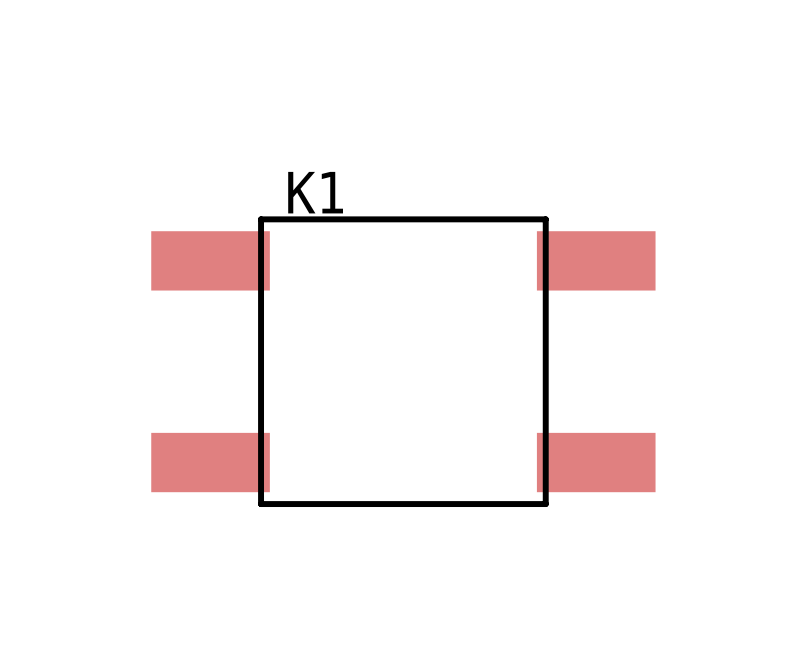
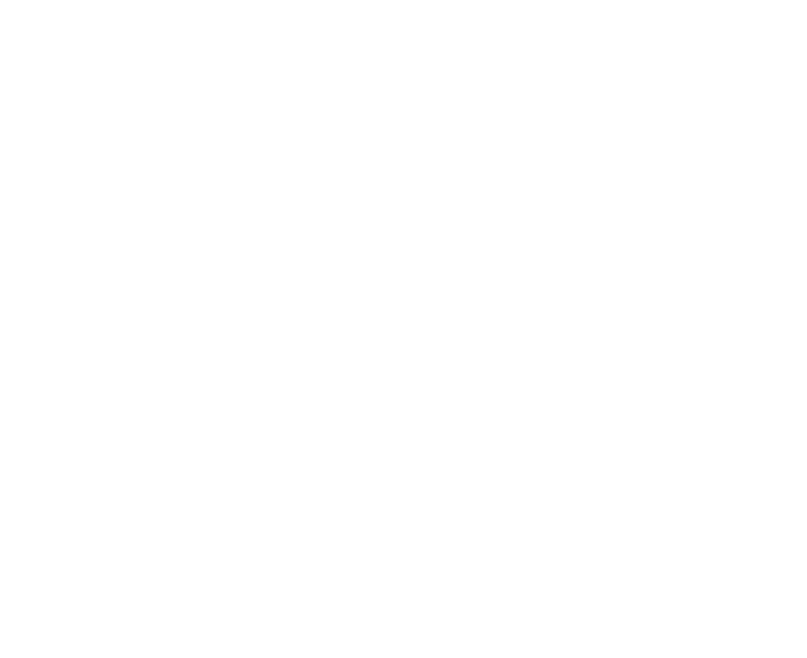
K1: (403, 361) -> none

